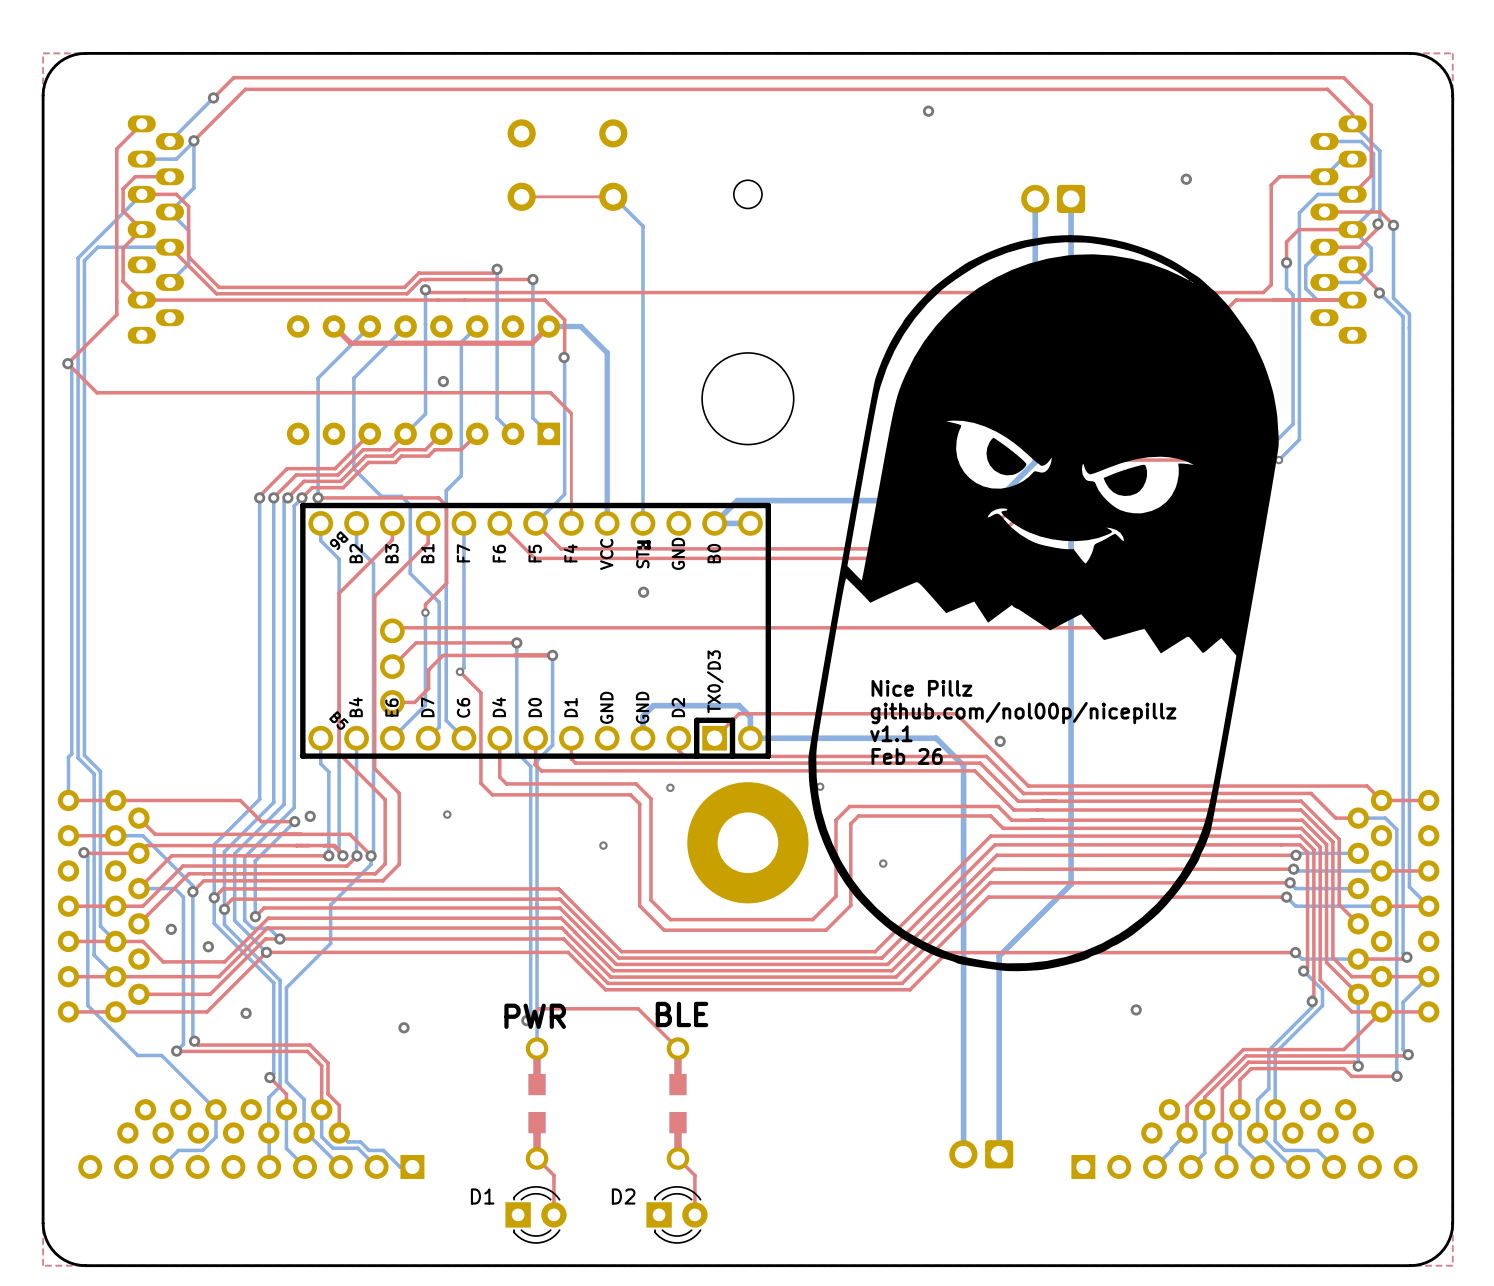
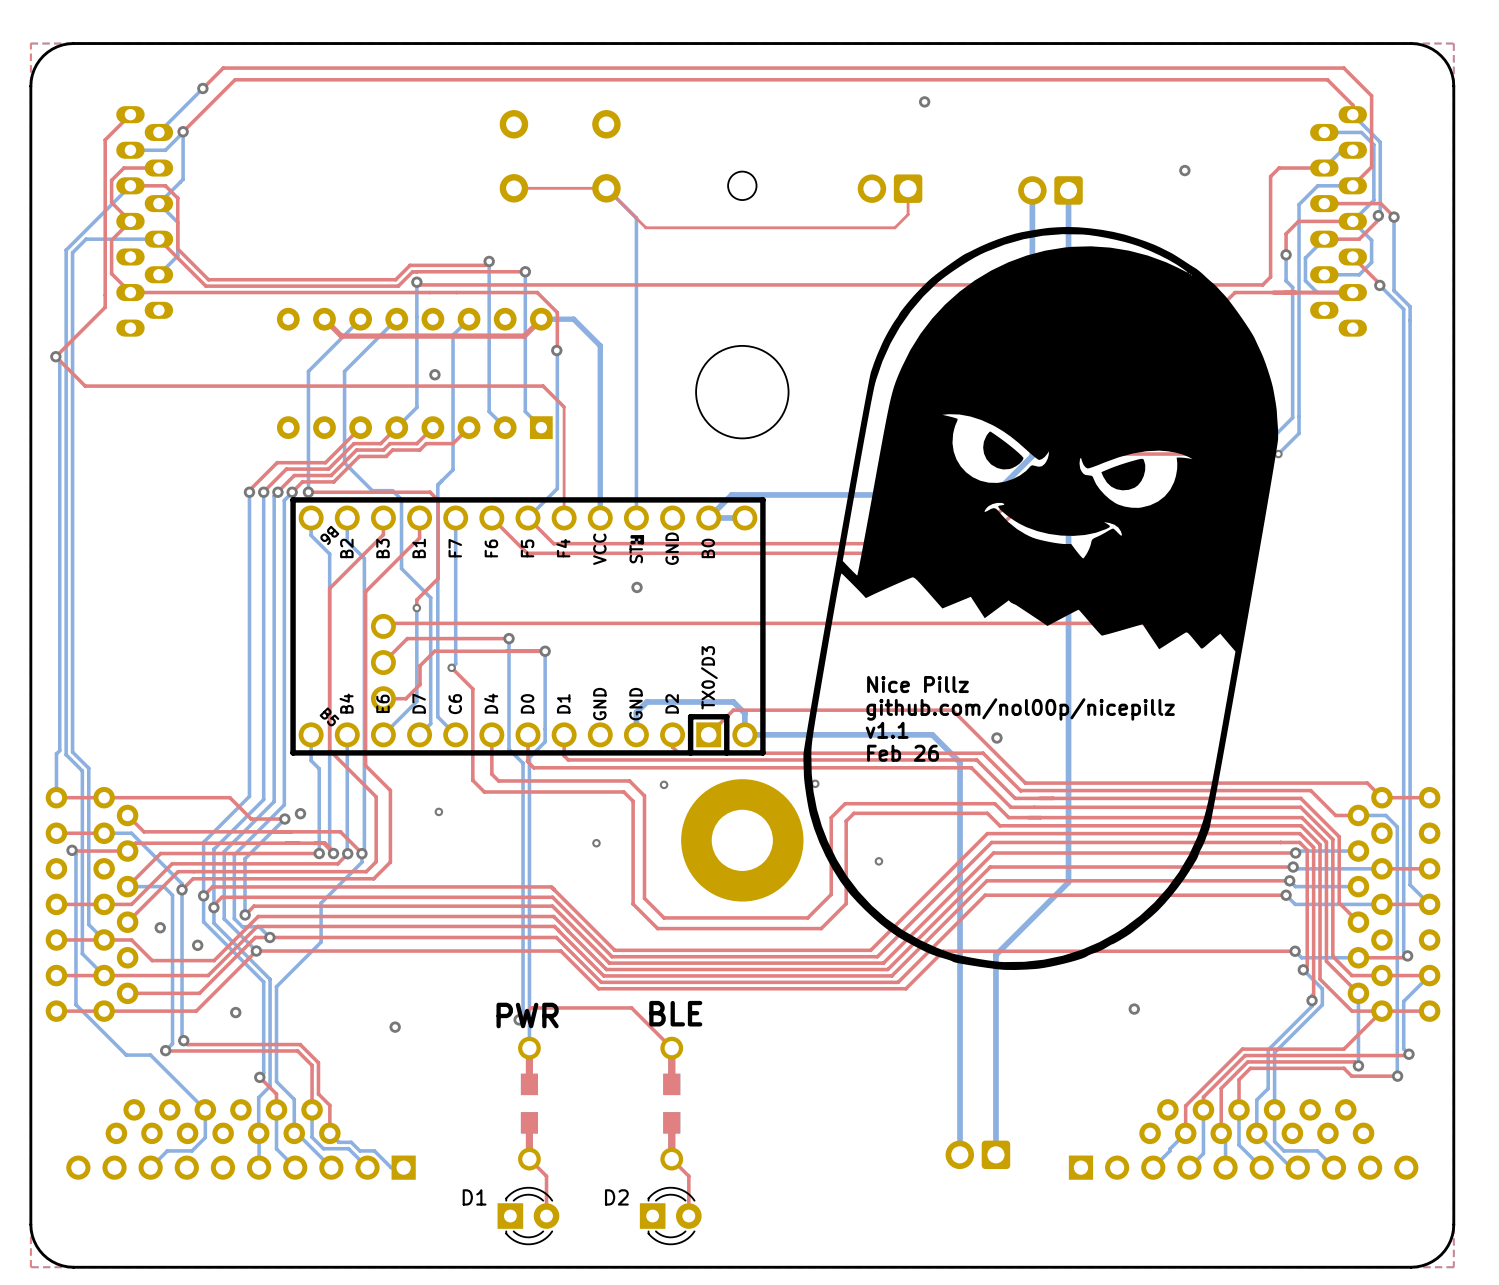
top track: none -> (606, 188) (645, 227) (894, 227) (908, 214) (908, 188)
part: none -> (890, 188)

